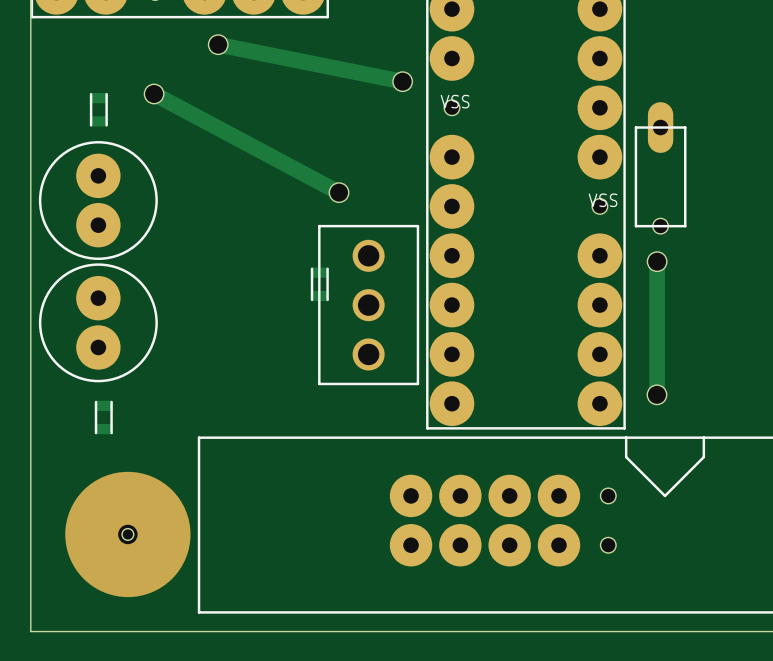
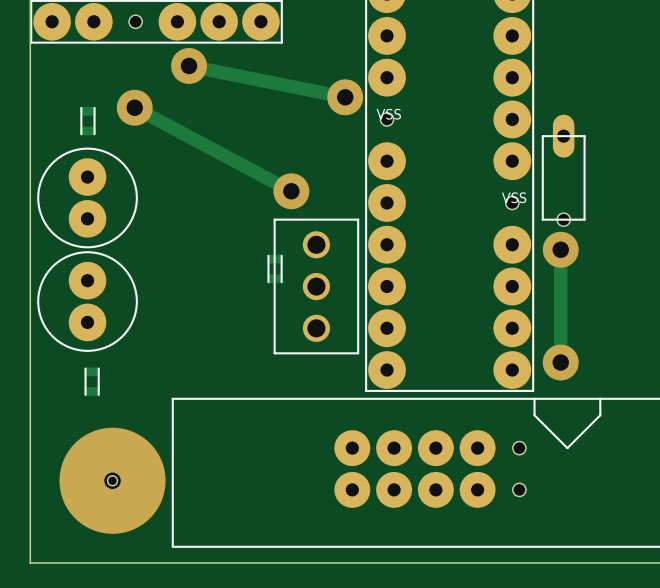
hole: (218, 44) -> none
via: none -> (189, 65)
hole: (402, 81) -> none
via: none -> (345, 97)
hole: (154, 93) -> none
via: none -> (134, 107)
hole: (339, 192) -> none
via: none -> (291, 191)
hole: (657, 261) -> none
via: none -> (560, 249)
hole: (656, 394) -> none
via: none -> (560, 362)

